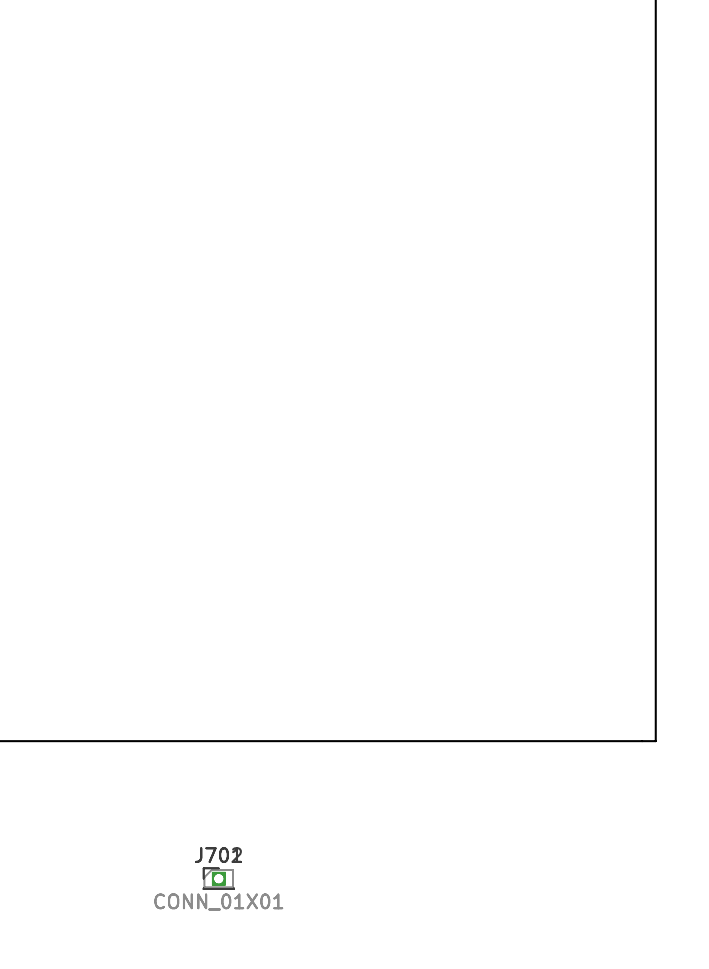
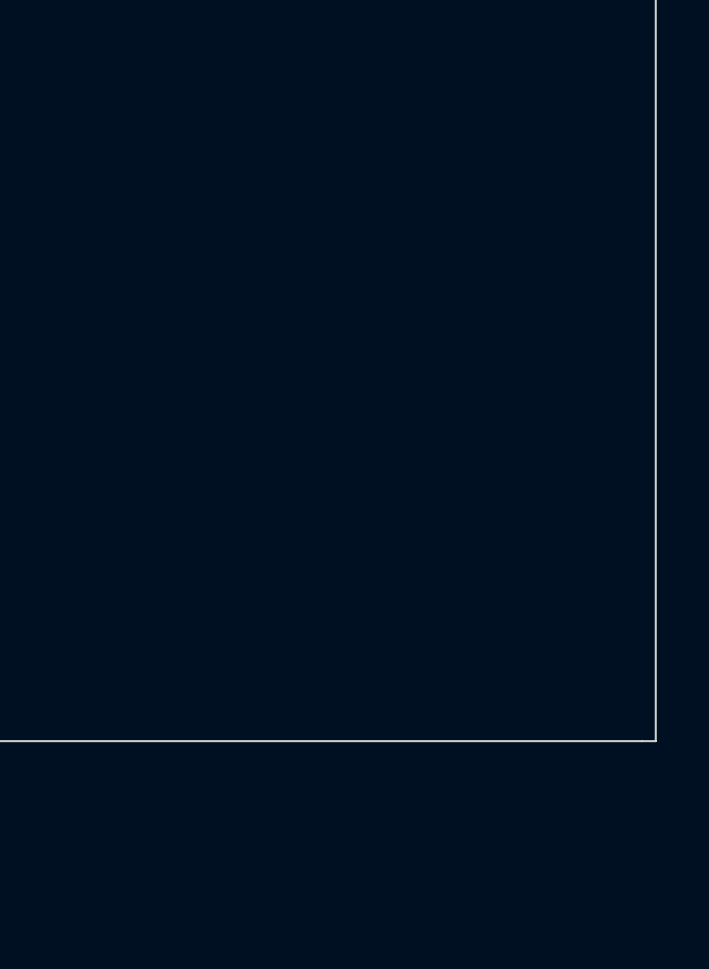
part: CONN_01X01 (218, 878) -> none
part: CONN_01X01 (218, 878) -> none

